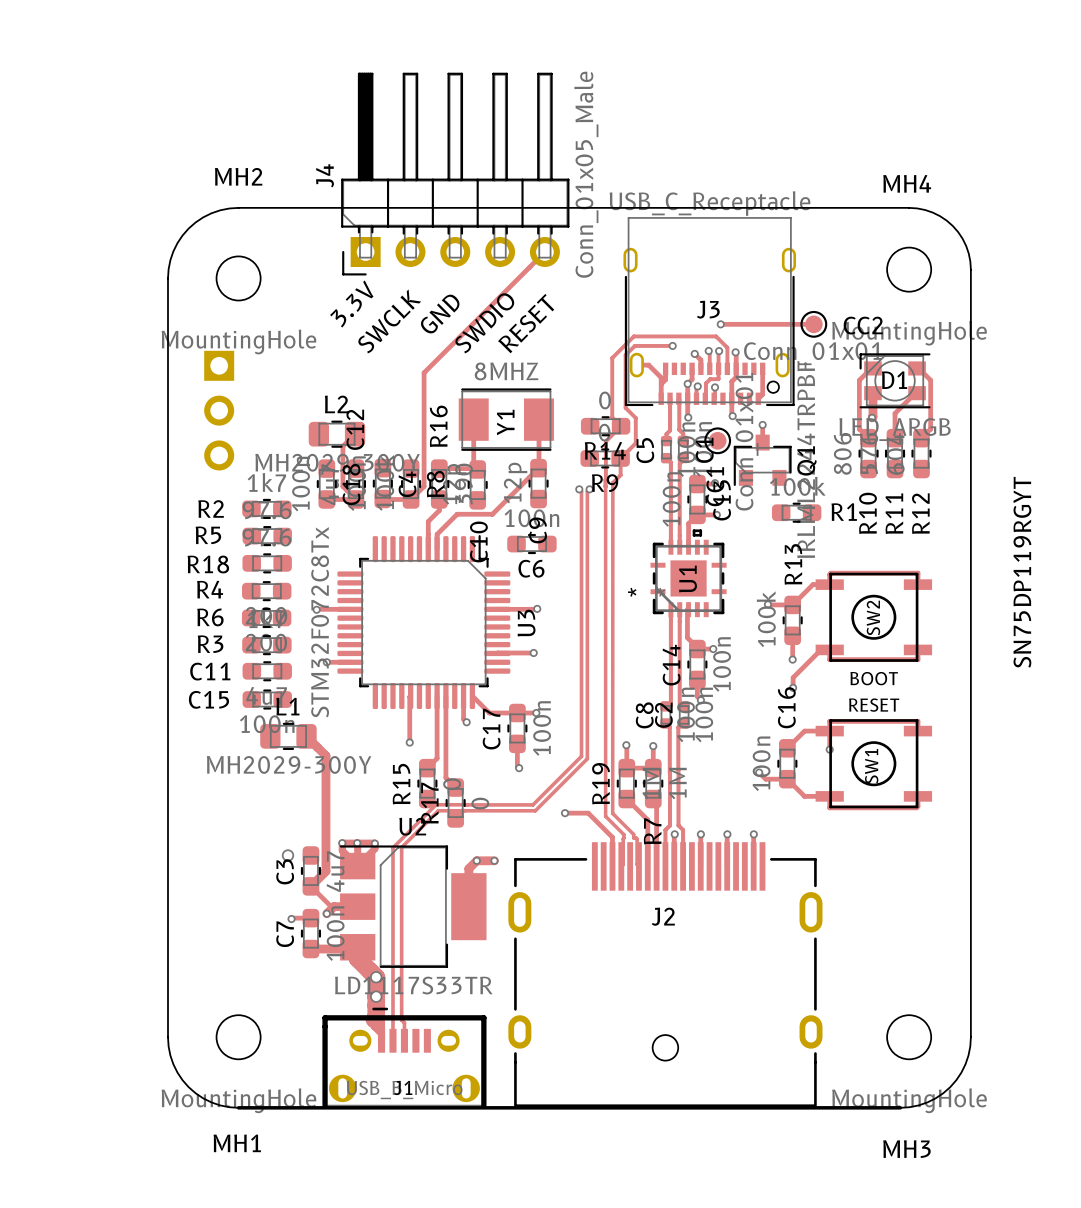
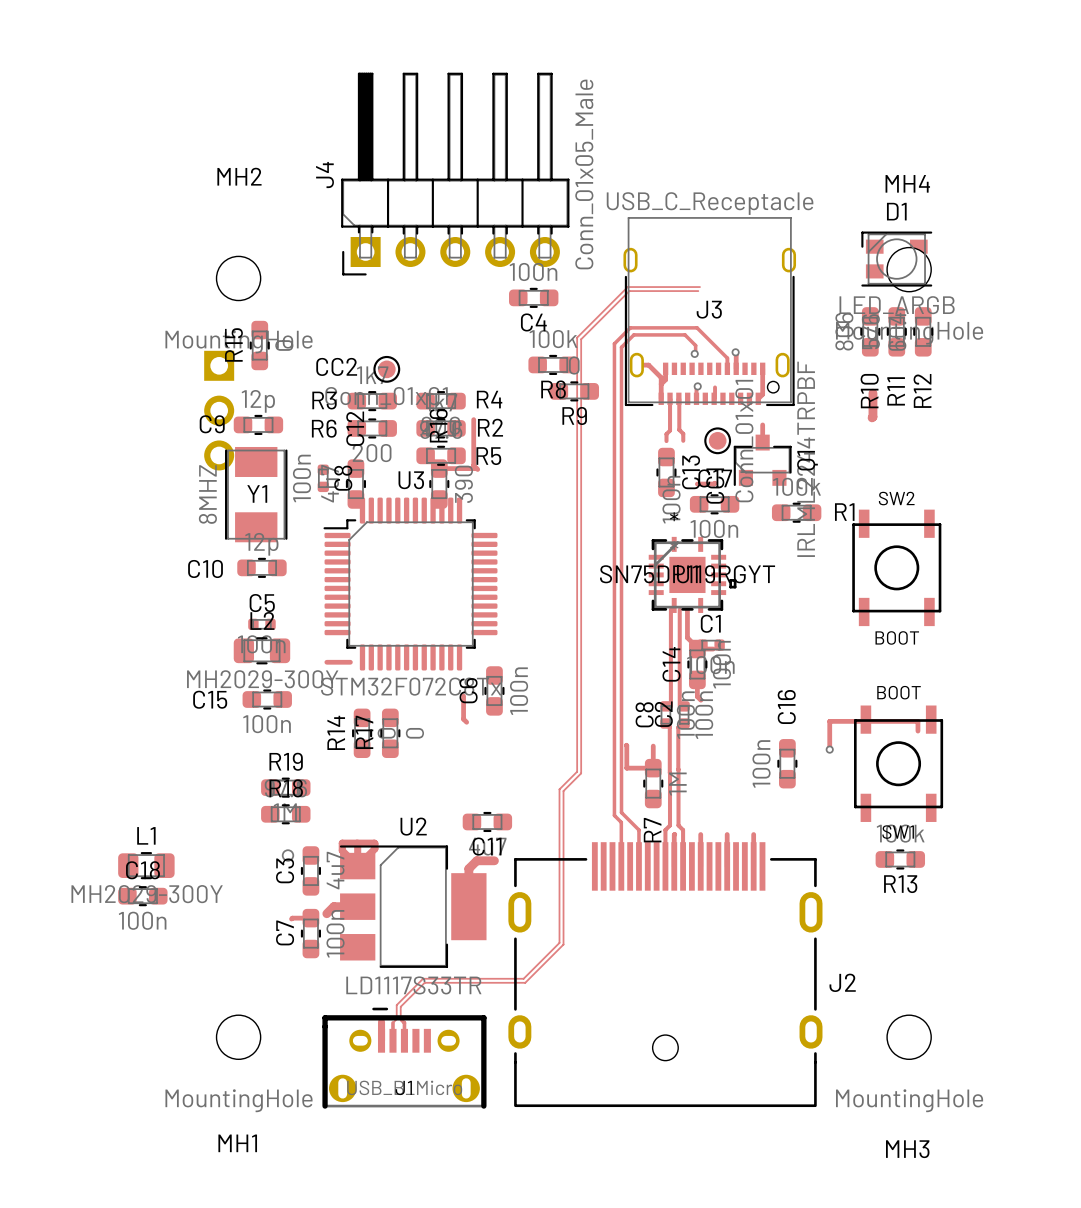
board edge: (238, 207) (909, 207) (932, 212) (946, 220) (958, 232) (968, 253) (970, 269) (970, 1037) (965, 1064) (956, 1080) (943, 1093) (918, 1105) (900, 1107) (238, 1107) (211, 1102) (195, 1093) (182, 1080) (173, 1064) (168, 1037) (168, 278) (173, 251) (188, 228) (211, 213) (238, 207) -> none
track: (544, 251) (424, 372) (424, 486) (411, 499) (382, 499) -> none
text: 3.3V (351, 303) -> none
text: GND (440, 314) -> none
text: SWCLK (389, 321) -> none
text: SWDIO (484, 323) -> none
text: RESET (526, 323) -> none
track: (720, 324) (813, 324) -> none
via: (720, 324) -> none
CC2 position: (813, 324) -> (386, 369)
CC2 name position: CC2 (863, 325) -> CC2 (336, 366)
track: (672, 345) (634, 345) (625, 355) (625, 407) (635, 418) (635, 443) (620, 458) (620, 475) (612, 482) -> none
via: (672, 345) -> none
track: (708, 350) (709, 368) -> none
via: (708, 350) -> none
track: (719, 351) (718, 378) (710, 379) (705, 383) (705, 398) -> none
via: (719, 351) -> none
track: (694, 353) (700, 360) (700, 368) -> none
track: (727, 358) (727, 347) (716, 336) (633, 336) (612, 358) (612, 417) (621, 426) (605, 441) (605, 486) -> none
track: (692, 368) (692, 379) (687, 383) (688, 417) -> none
track: (736, 368) (736, 377) (731, 381) (732, 416) -> none
track: (872, 368) (859, 380) (859, 428) (868, 438) -> none
track: (917, 368) (930, 380) (930, 428) (921, 438) -> none
Y1 value position: 8MHZ (506, 371) -> 8MHZ (207, 494)
D1 name position: D1 (894, 380) -> D1 (896, 211)
D1 position: (895, 380) -> (896, 259)
via: (687, 383) -> none
via: (715, 387) -> none
track: (917, 393) (895, 413) (895, 438) -> none
via: (732, 416) -> none
via: (688, 417) -> none
via: (872, 417) -> none
Y1 rotation: 0° (506, 419) -> 90° clockwise (256, 494)
Y1 position: (506, 419) -> (256, 494)
track: (539, 419) (539, 467) (492, 514) (457, 514) (437, 534) (437, 549) -> none
via: (762, 424) -> none
R14 rotation: 0° (605, 426) -> 90° clockwise (362, 733)
R14 position: (605, 426) -> (362, 733)
L2 position: (336, 434) -> (261, 650)
track: (355, 434) (342, 446) (342, 486) (355, 499) (326, 499) -> none
C5 rotation: 0° (666, 449) -> 90° clockwise (261, 624)
C5 position: (666, 449) -> (261, 624)
C1 rotation: 0° (683, 449) -> 90° clockwise (711, 645)
C1 position: (683, 449) -> (711, 645)
R10 position: (868, 453) -> (870, 331)
R11 position: (895, 453) -> (896, 331)
R12 position: (921, 453) -> (923, 331)
track: (683, 457) (679, 463) (679, 547) -> none
R9 position: (605, 458) -> (574, 391)
track: (666, 458) (670, 462) (670, 547) -> none
C8: none -> 100n (323, 478)
C4 rotation: 0° (382, 483) -> 90° clockwise (533, 297)
C4 position: (382, 483) -> (533, 297)
C9 rotation: 0° (538, 483) -> 90° clockwise (258, 424)
C9 position: (538, 483) -> (258, 424)
track: (612, 483) (612, 813) (633, 834) (633, 837) (637, 838) (637, 864) (638, 866) -> (695, 350) (695, 345) (685, 334) (633, 334) (621, 347) (621, 812) (638, 830) (638, 866)
via: (715, 483) -> none
C18 value position: 100n (301, 484) -> 100n (142, 920)
C18 rotation: 0° (326, 484) -> 90° clockwise (142, 896)
C18 position: (326, 484) -> (142, 896)
C18 name position: C18 (351, 484) -> C18 (142, 870)
R8 rotation: 0° (411, 484) -> 90° clockwise (553, 364)
R8 position: (411, 484) -> (553, 364)
C10 rotation: 0° (477, 484) -> 90° clockwise (261, 567)
C10 position: (477, 484) -> (261, 567)
track: (605, 487) (605, 816) (623, 834) (623, 864) (621, 866) -> (727, 358) (697, 327) (630, 327) (614, 343) (614, 815) (621, 822) (621, 866)
track: (579, 489) (581, 491) (581, 756) (532, 804) (436, 804) -> none
via: (579, 489) -> none
track: (589, 489) (587, 491) (587, 758) (535, 810) (438, 810) (401, 847) (401, 1020) -> (698, 291) (629, 291) (581, 339) (581, 773) (563, 791) (563, 944) (525, 982) (424, 982) (400, 1006) (401, 1020)
via: (589, 489) -> none
track: (439, 499) (439, 510) (428, 521) (428, 549) -> none
C13 position: (697, 499) -> (666, 472)
R2 name position: R2 (211, 508) -> R2 (490, 427)
R2 position: (266, 508) -> (441, 428)
track: (716, 514) (697, 514) (688, 523) (688, 547) -> none
via: (716, 514) -> none
R5 name position: R5 (208, 535) -> R5 (488, 456)
R5 position: (267, 536) -> (441, 455)
C6 rotation: 0° (531, 544) -> 90° clockwise (494, 690)
C6 position: (531, 544) -> (494, 690)
R18 position: (267, 563) -> (285, 814)
R18 name position: R18 (208, 564) -> R18 (286, 788)
R13 name position: R13 (793, 564) -> R13 (900, 884)
U1 value position: SN75DP119RGYT (1022, 572) -> SN75DP119RGYT (687, 574)
U1 rotation: 0° (688, 573) -> 90° clockwise (692, 574)
track: (917, 584) (917, 573) (831, 573) (829, 584) (812, 584) (792, 604) (767, 604) -> none
R4 name position: R4 (210, 589) -> R4 (489, 399)
R4 position: (266, 591) -> (441, 401)
via: (767, 604) -> none
track: (537, 608) (497, 609) -> none
via: (537, 608) -> none
via: (316, 609) -> none
track: (350, 609) (316, 609) -> none
R6 name position: R6 (210, 617) -> R6 (324, 428)
R6 position: (266, 617) -> (372, 428)
SW2 rotation: 0° (873, 617) -> 90° clockwise (896, 567)
SW2 name position: SW2 (873, 617) -> SW2 (896, 498)
R13 rotation: 0° (792, 620) -> 90° clockwise (900, 859)
R13 position: (792, 620) -> (900, 859)
U3 rotation: 0° (423, 622) -> 90° counterclockwise (410, 584)
track: (792, 635) (792, 659) -> none
R3 name position: R3 (210, 644) -> R3 (324, 400)
R3 position: (266, 645) -> (372, 401)
via: (713, 649) -> none
track: (917, 649) (917, 659) (829, 659) (829, 649) (820, 649) (793, 677) (793, 687) -> none
track: (533, 653) (497, 653) -> none
via: (533, 653) -> none
via: (792, 659) -> none
via: (326, 662) -> none
C11 name position: C11 (210, 671) -> C11 (487, 846)
C11 position: (267, 671) -> (487, 821)
via: (793, 687) -> none
track: (410, 696) (409, 742) -> none
track: (437, 696) (437, 758) (427, 768) -> none
track: (445, 696) (445, 777) (455, 787) -> none
track: (472, 696) (489, 713) (536, 713) -> none
via: (700, 700) -> none
SW1 value: RESET (874, 705) -> BOOT (899, 692)
via: (536, 713) -> none
via: (466, 722) -> none
C17 rotation: 0° (517, 728) -> 90° clockwise (714, 504)
C17 position: (517, 728) -> (714, 504)
track: (829, 731) (804, 731) (787, 748) -> none
L1 position: (288, 736) -> (146, 865)
track: (306, 736) (325, 755) (325, 871) (310, 886) (331, 906) (333, 906) -> none
via: (409, 742) -> none
track: (517, 743) (517, 766) (519, 768) -> none
via: (626, 745) -> none
via: (653, 746) -> none
SW1 rotation: 0° (873, 763) -> 90° clockwise (898, 763)
SW1 name position: SW1 (871, 766) -> SW1 (898, 832)
via: (519, 768) -> none
track: (759, 772) (765, 779) (787, 779) (804, 796) (829, 796) (829, 807) (916, 807) (917, 796) -> none
via: (759, 772) -> none
R15 position: (427, 783) -> (259, 345)
R19 rotation: 0° (626, 783) -> 90° clockwise (285, 787)
R19 position: (626, 783) -> (285, 787)
track: (626, 799) (647, 820) (647, 866) -> none
track: (653, 799) (656, 802) (656, 866) -> none
R17 position: (455, 803) -> (390, 733)
track: (436, 804) (392, 847) (392, 1022) -> (699, 287) (627, 287) (577, 337) (577, 771) (559, 789) (559, 942) (523, 978) (423, 978) (396, 1005) (396, 1019) (392, 1022)
track: (565, 813) (588, 813) (612, 837) (612, 866) -> none
via: (565, 813) -> none
via: (674, 834) -> none
via: (700, 834) -> none
via: (727, 834) -> none
via: (753, 834) -> none
via: (342, 843) -> none
via: (357, 843) -> none
via: (374, 843) -> none
via: (476, 860) -> none
via: (494, 860) -> none
via: (326, 913) -> none
J2 name position: J2 (663, 916) -> J2 (842, 982)
via: (291, 919) -> none
track: (310, 949) (355, 949) (357, 947) (357, 958) (376, 977) (374, 1026) (381, 1033) -> none
via: (376, 977) -> none
via: (376, 996) -> none

